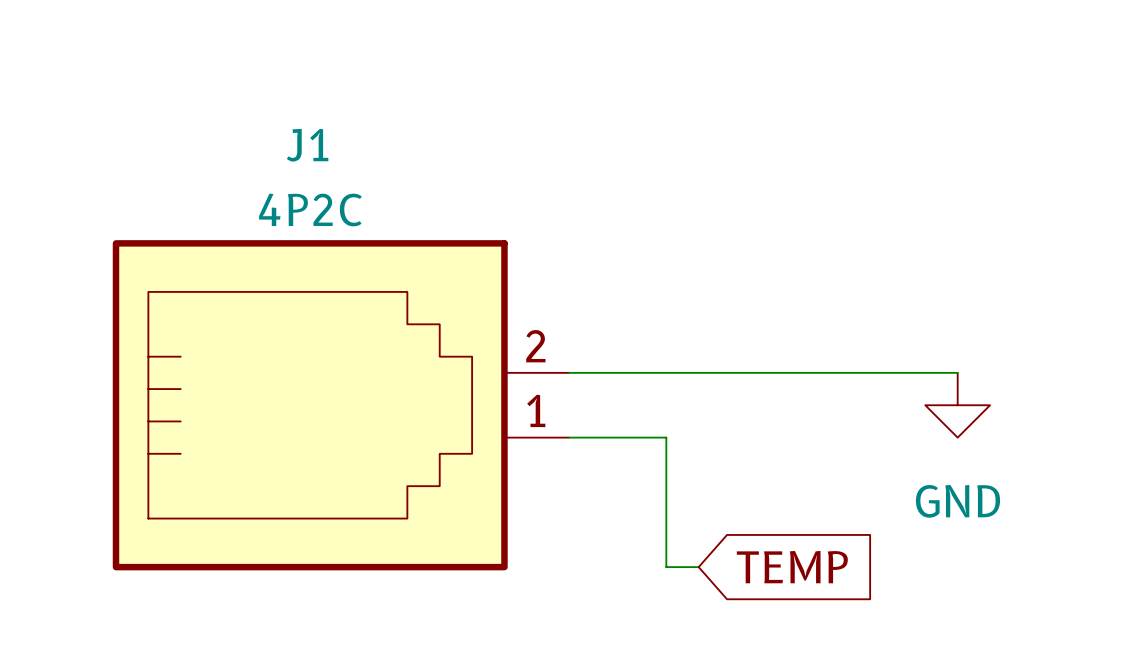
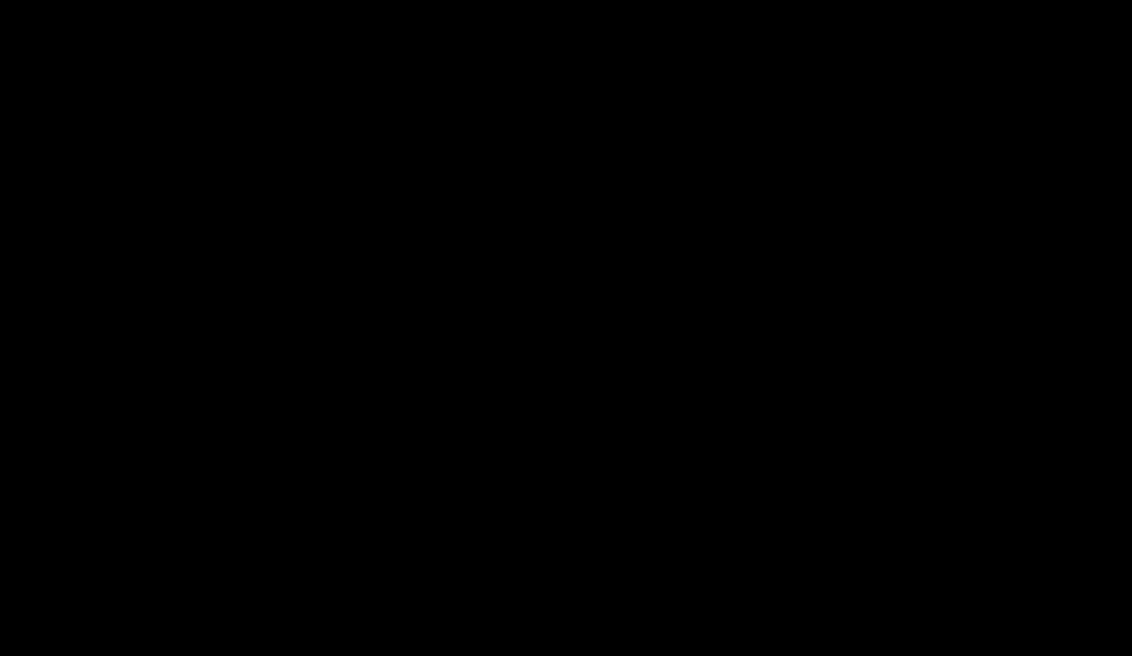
wire: (569, 372) (957, 372) -> none
J1: 4P2C (340, 405) -> none
power symbol: GND (957, 405) -> none
wire: (569, 437) (666, 437) (666, 567) (698, 567) -> none
global label: TEMP (792, 567) -> none

